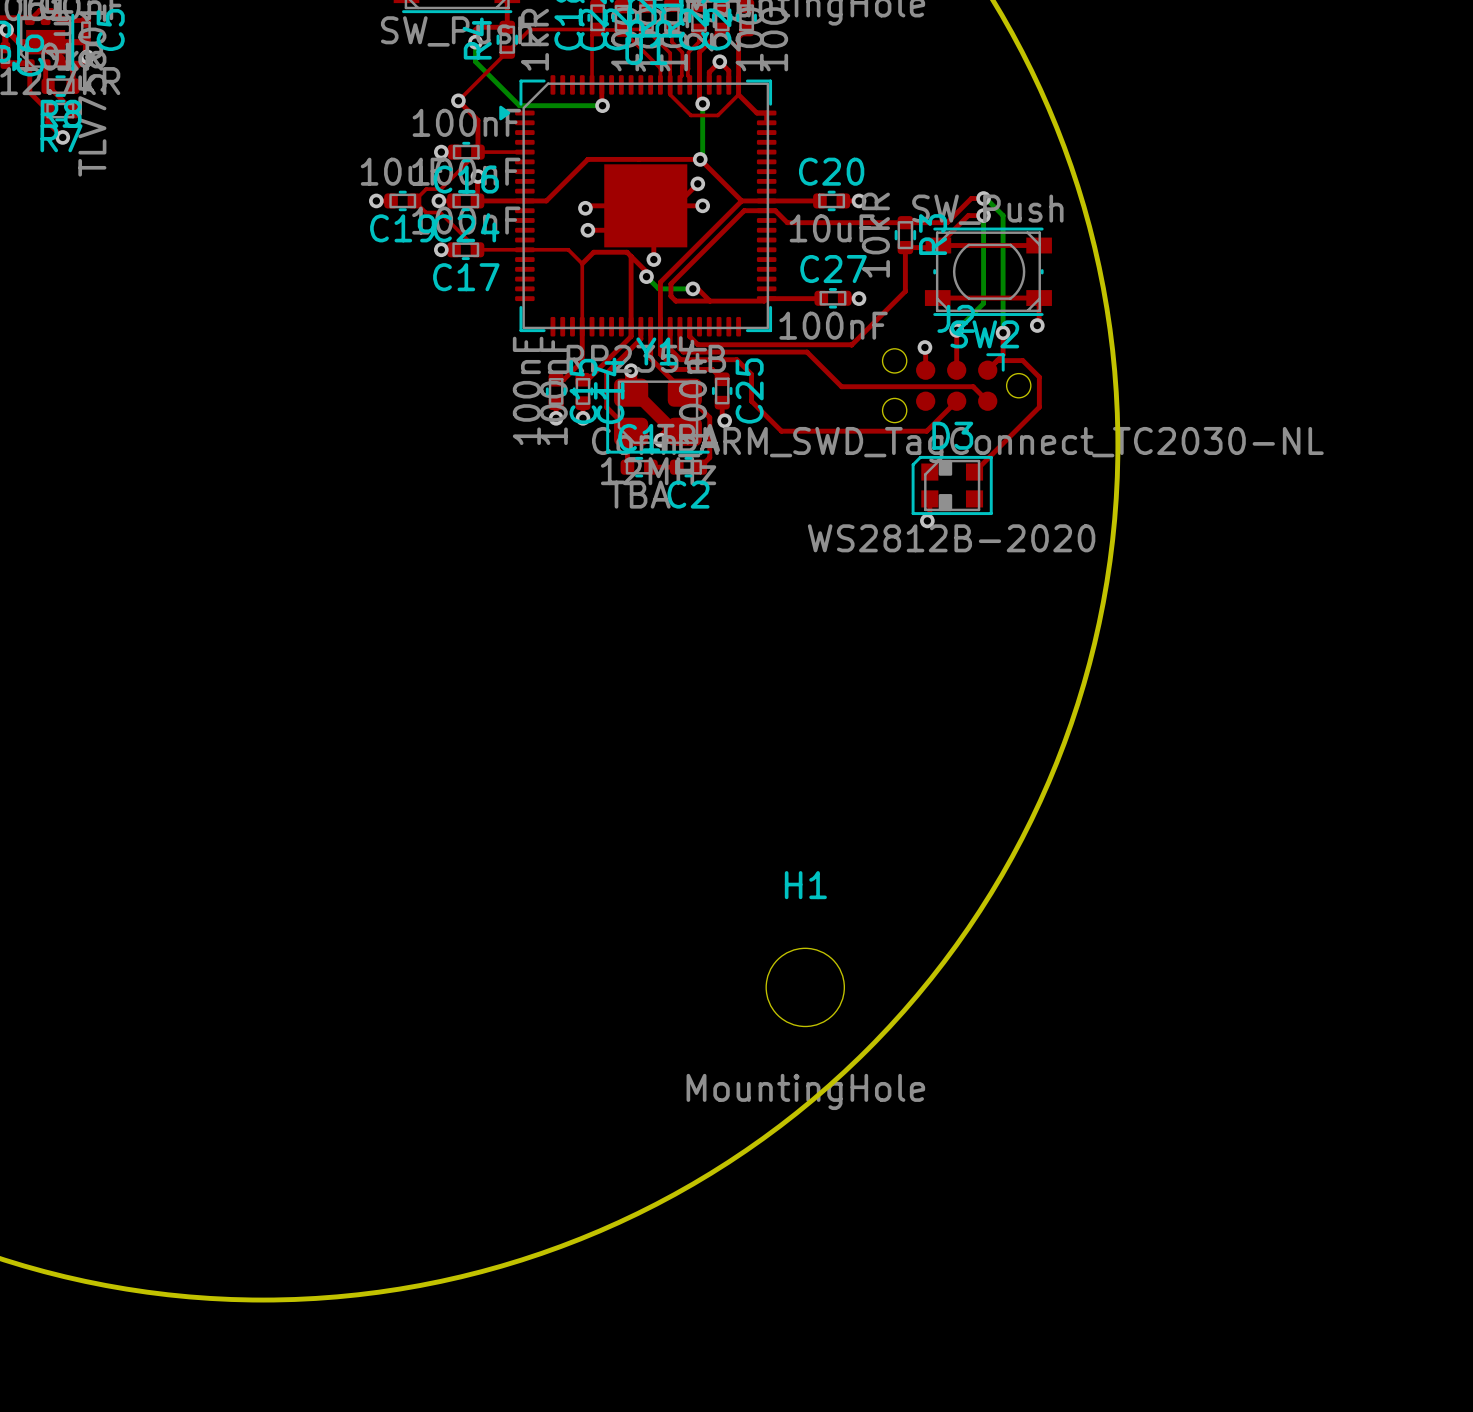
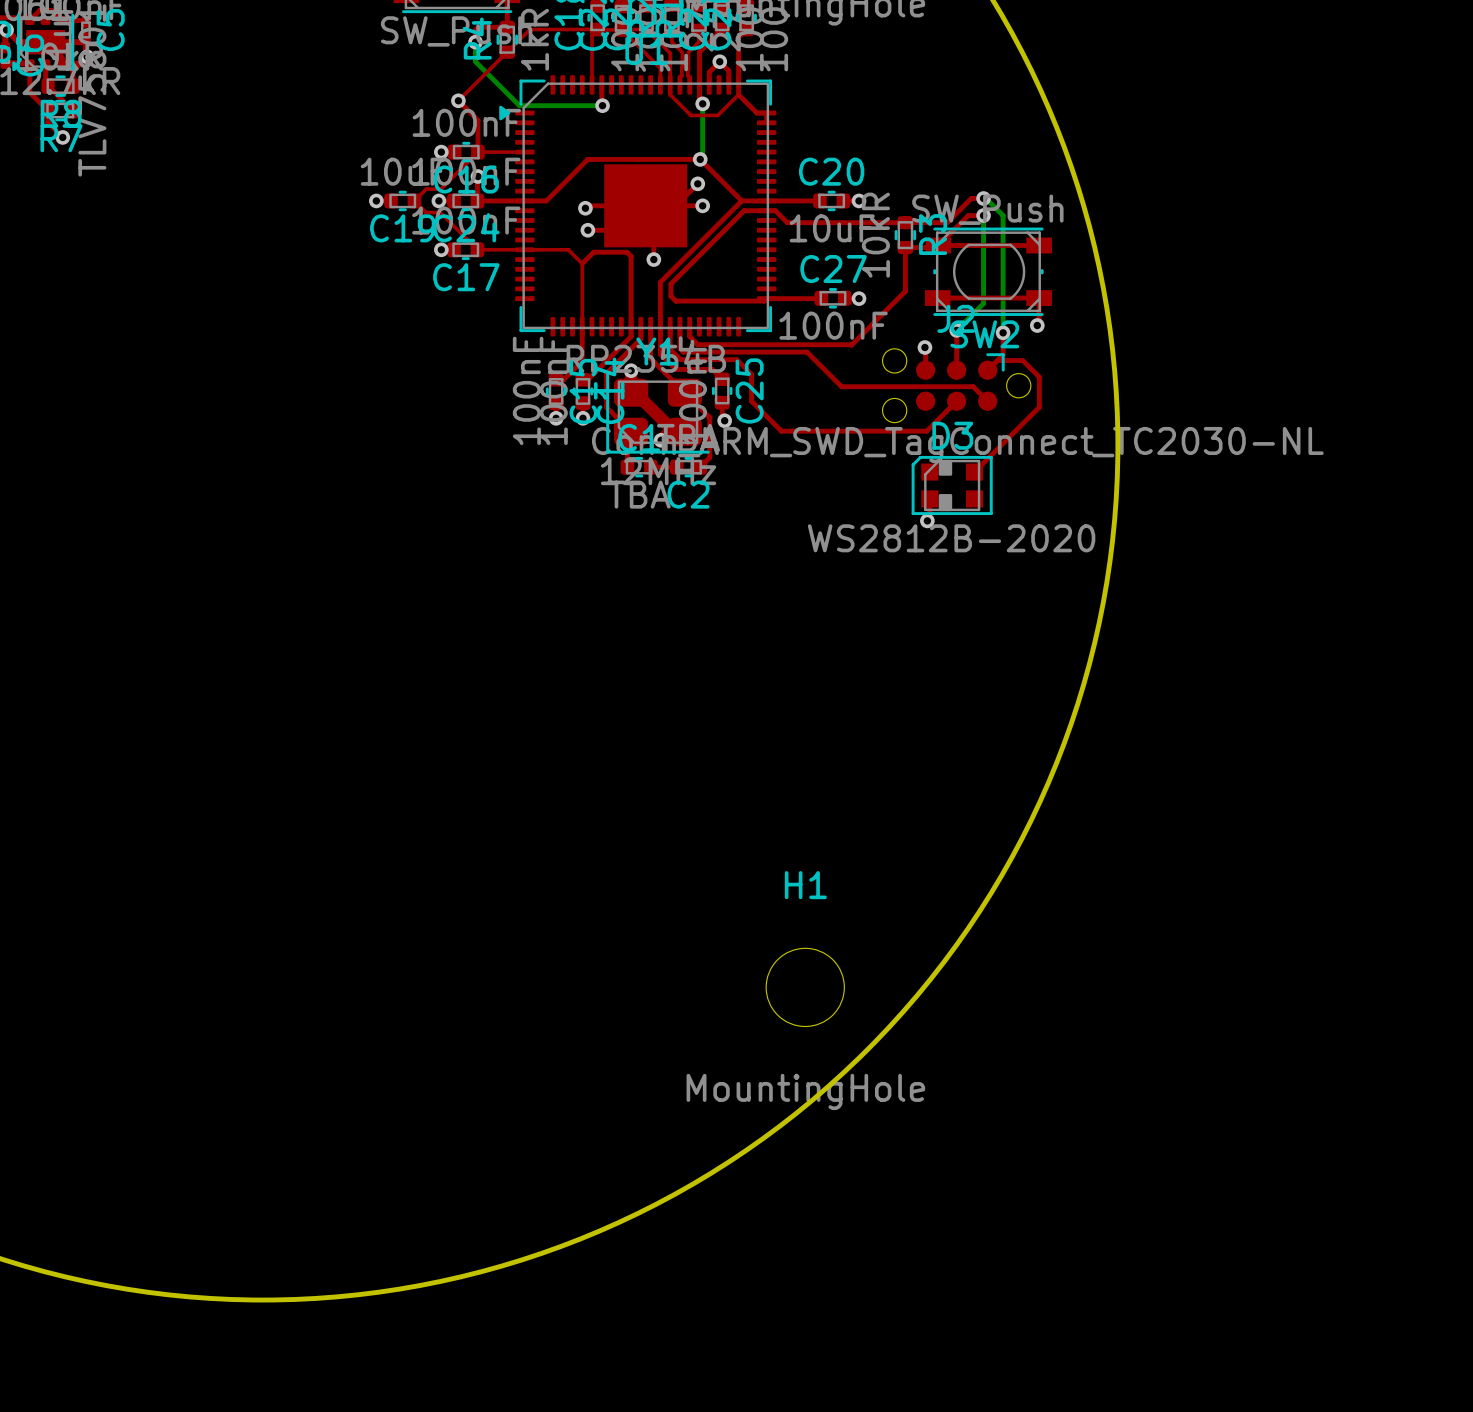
top track: (631, 256) (646, 271) (646, 276) -> none
bottom track: (646, 276) (658, 288) (692, 288) -> none
via: (646, 276) -> none
top track: (692, 288) (697, 288) (710, 301) -> none
via: (692, 288) -> none

